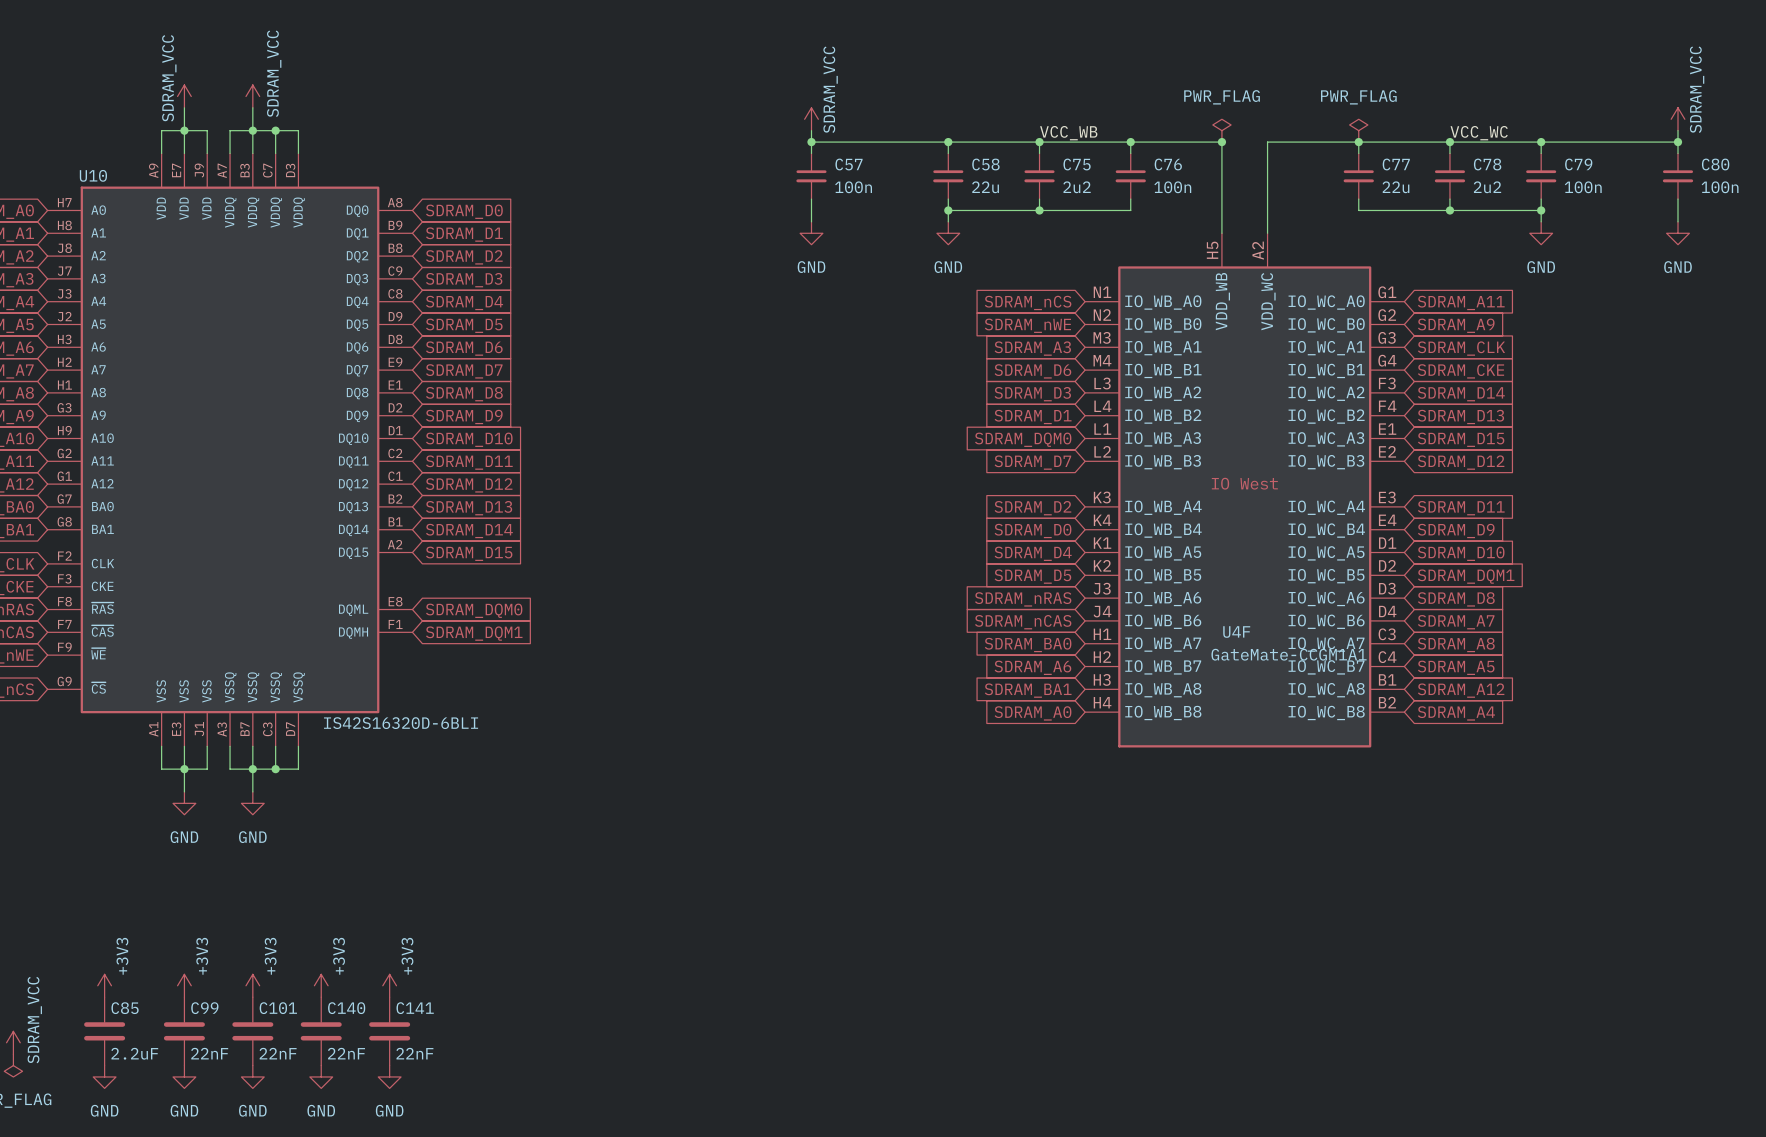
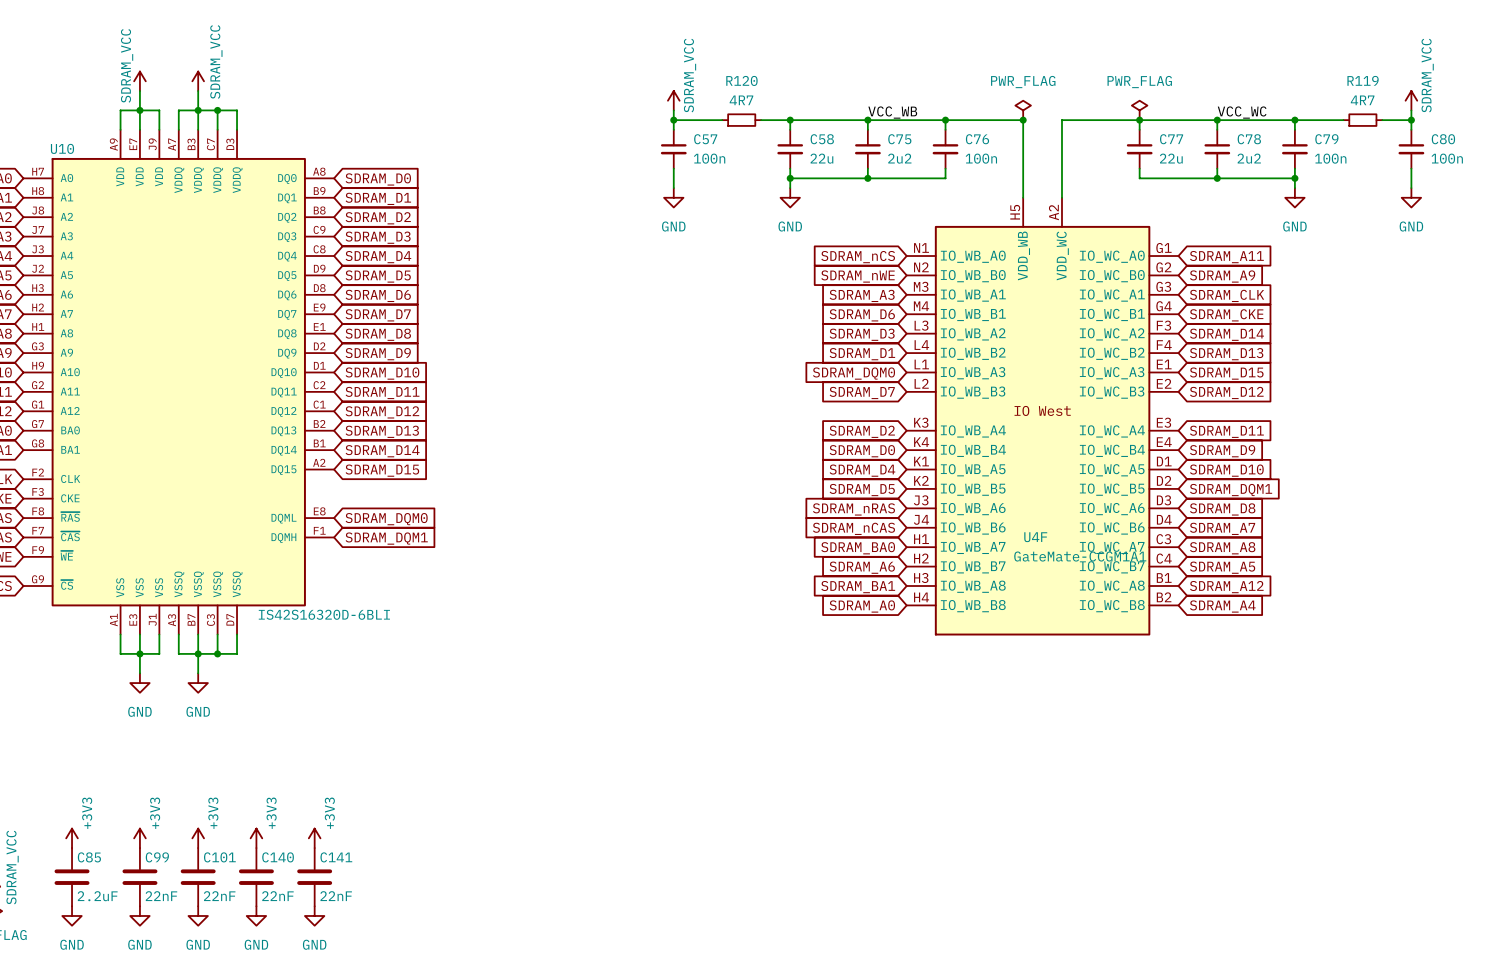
wire: (868, 142) (914, 142) -> none
R120: none -> 4R7 (741, 120)
wire: (1598, 142) (1643, 142) -> none
R119: none -> 4R7 (1362, 120)

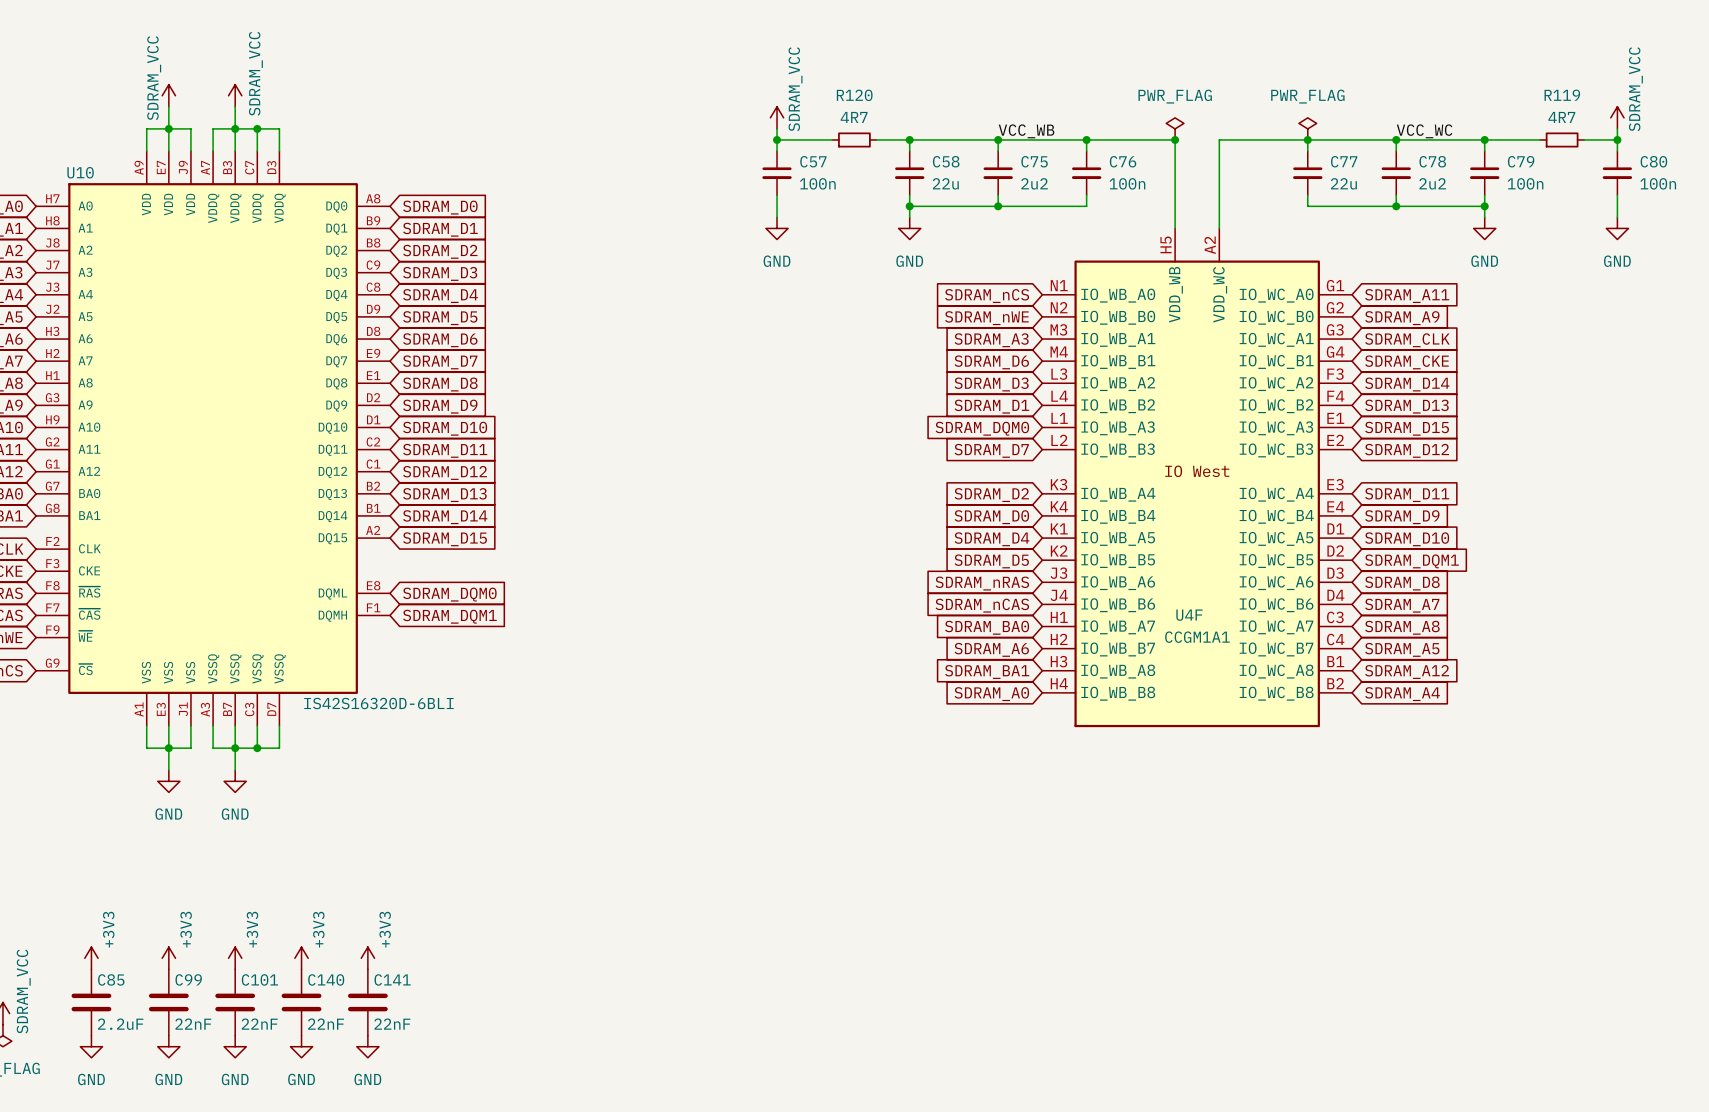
U4F value: GateMate-CCGM1A1 (1080, 556) -> CCGM1A1 (1197, 637)

